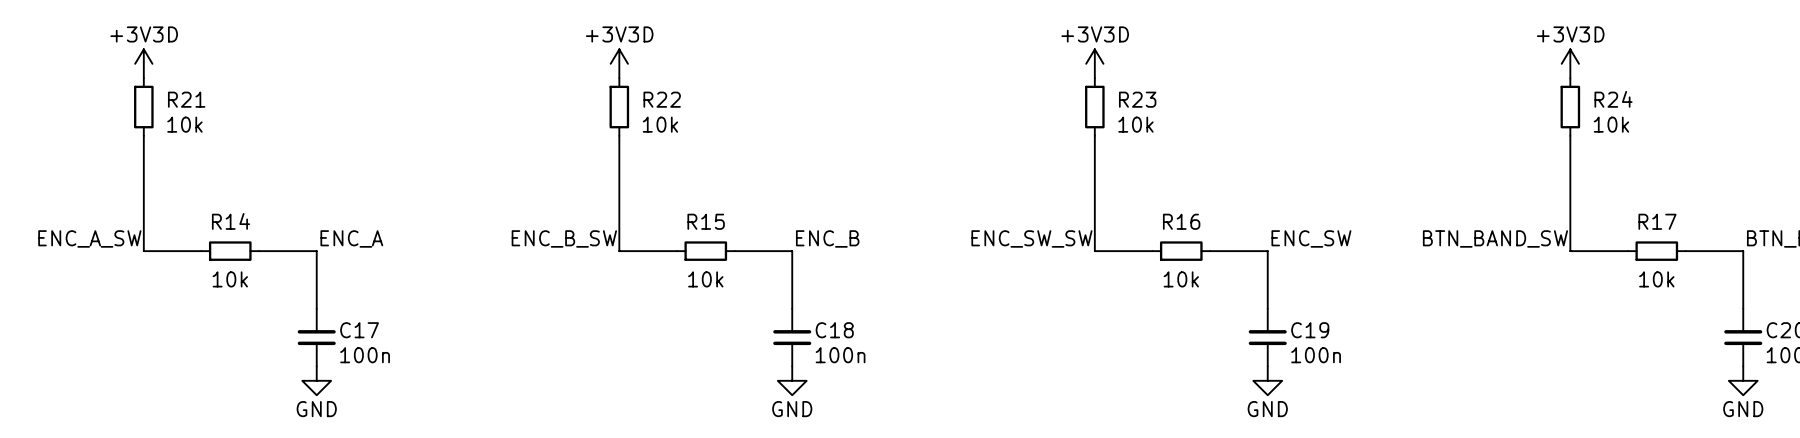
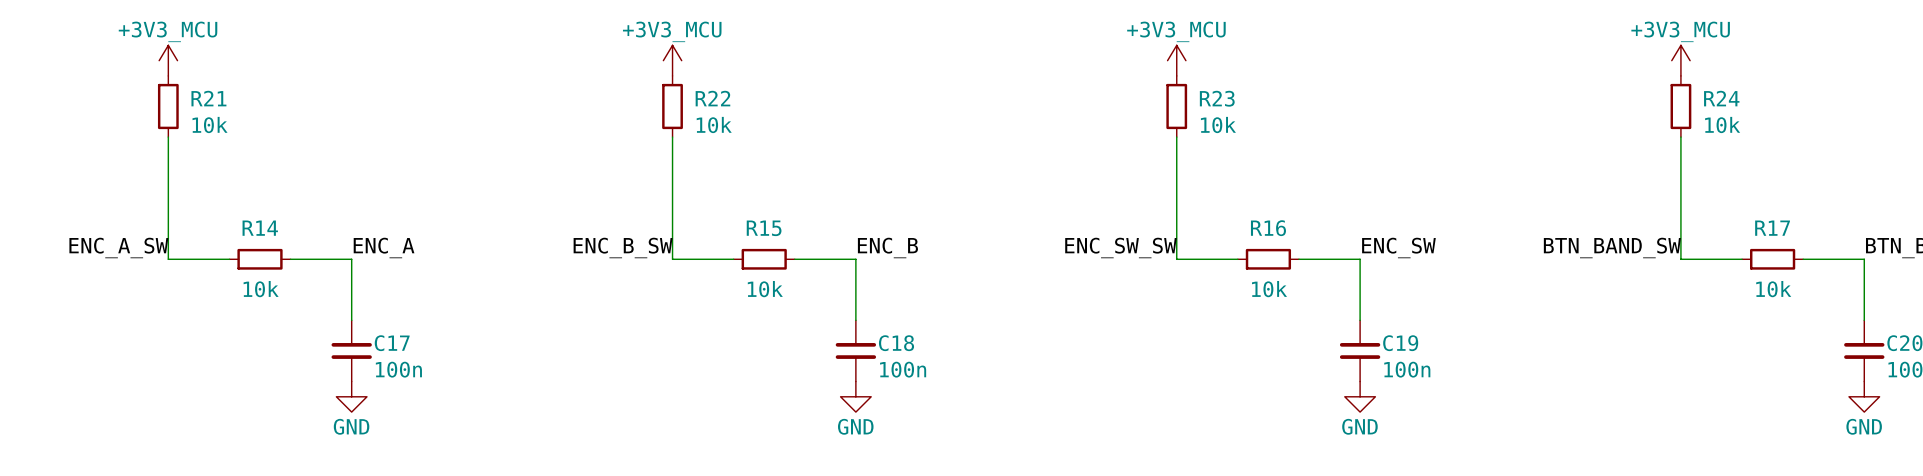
power symbol: +3V3D (143, 63) -> +3V3_MCU (168, 60)
power symbol: +3V3D (619, 63) -> +3V3_MCU (672, 60)
power symbol: +3V3D (1094, 63) -> +3V3_MCU (1176, 60)
power symbol: +3V3D (1570, 63) -> +3V3_MCU (1680, 60)

